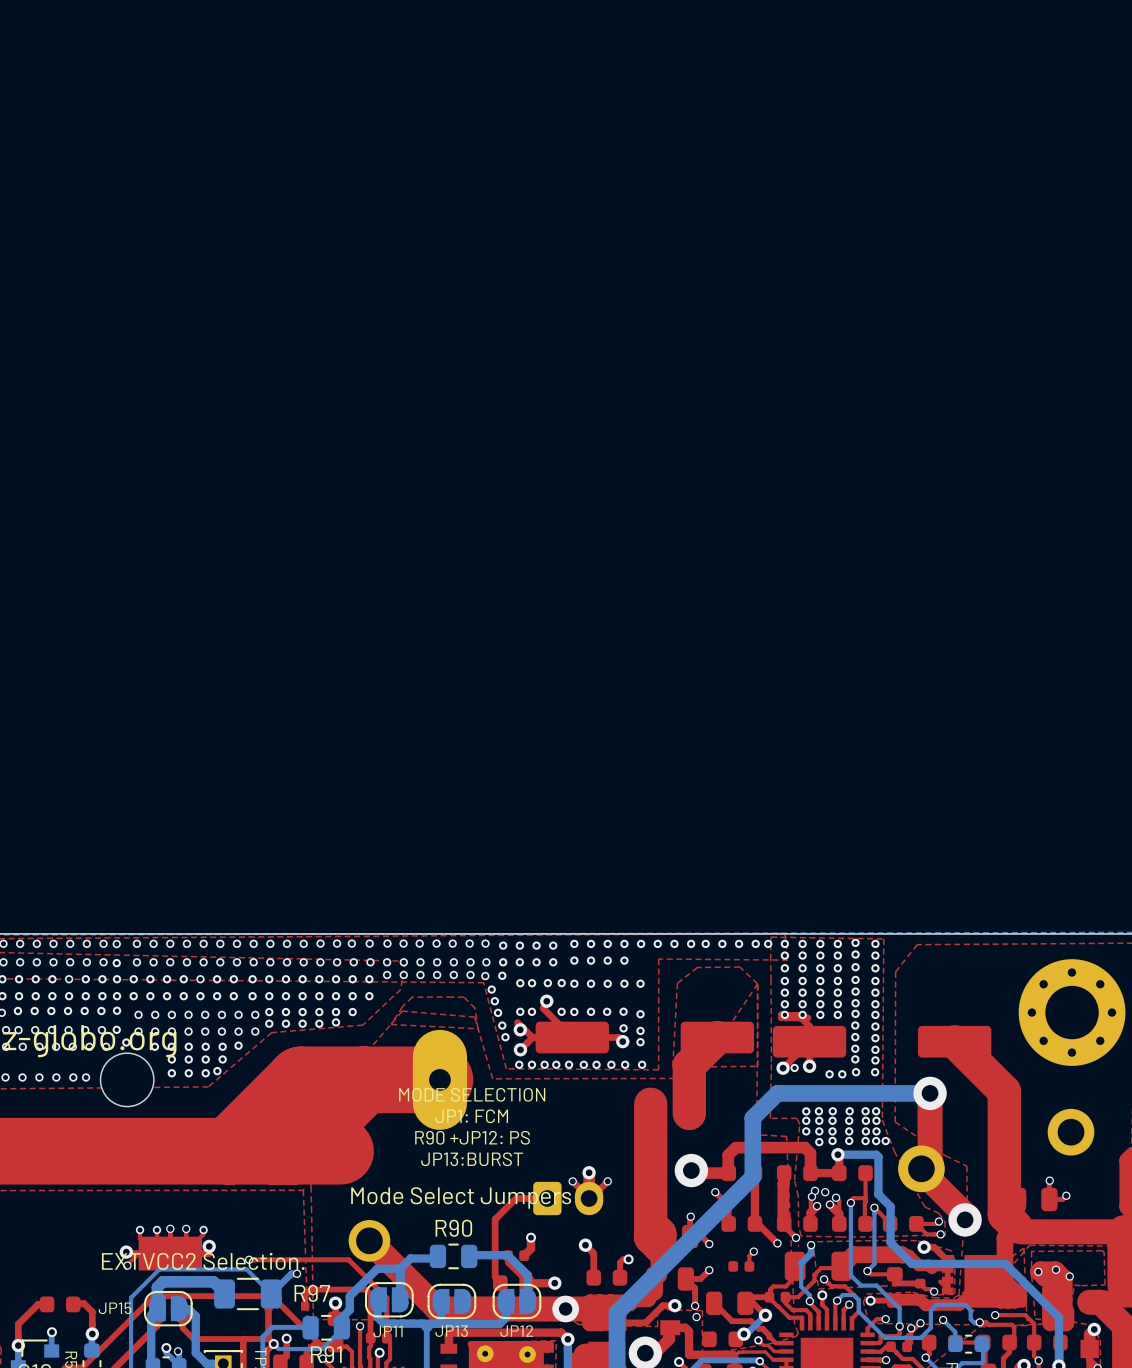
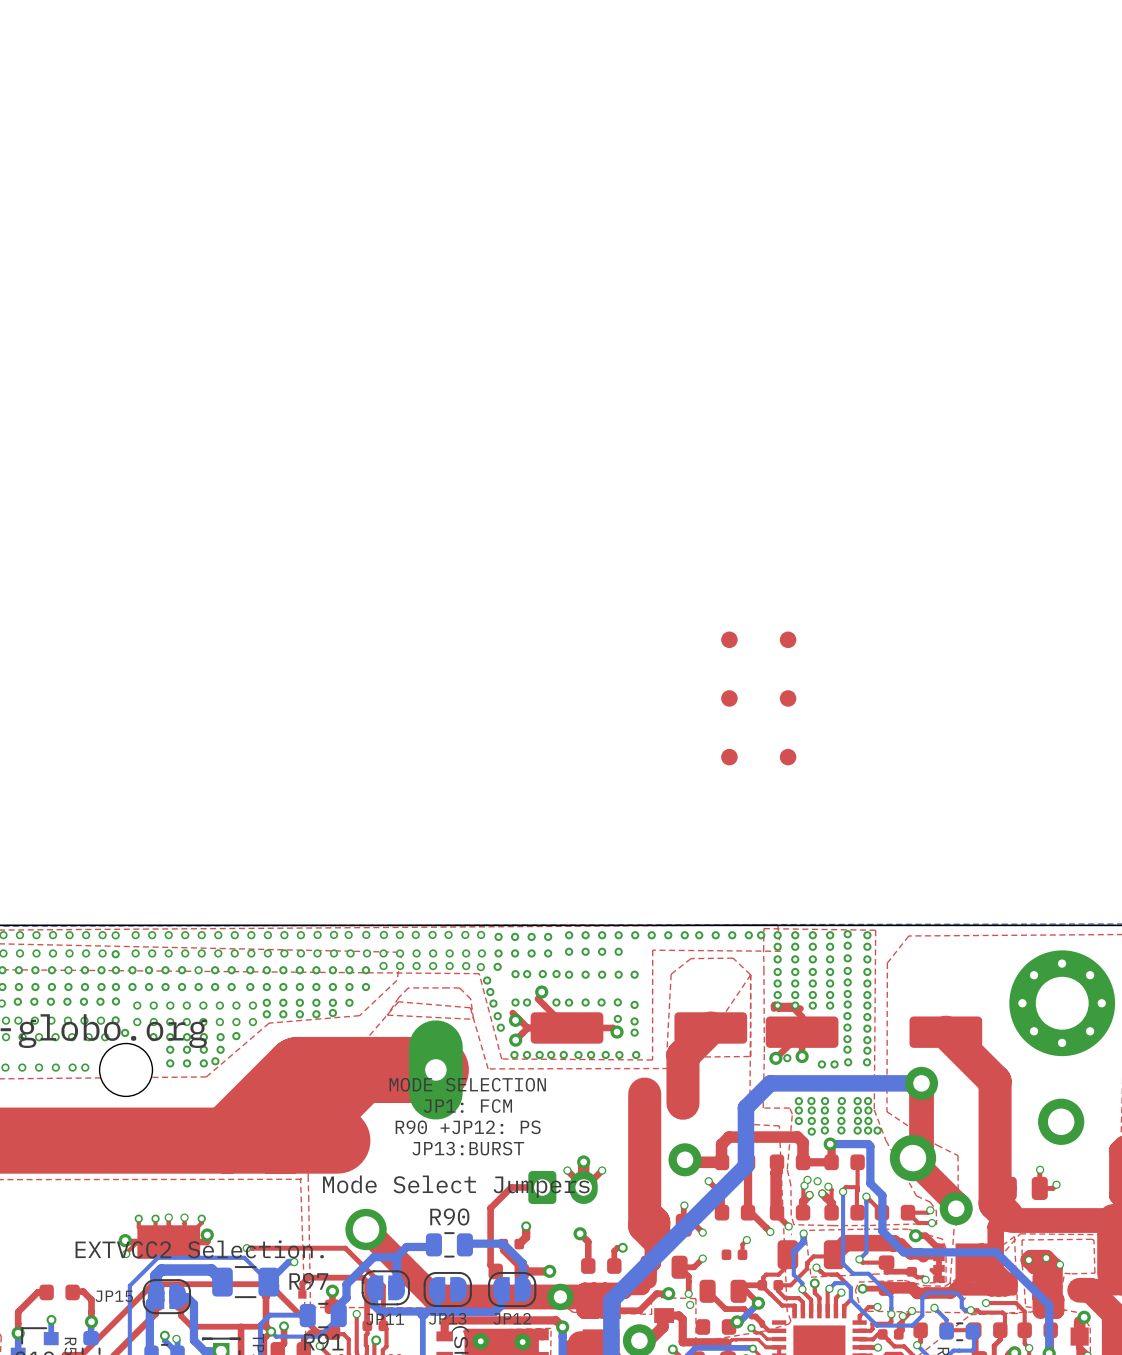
part: none -> (729, 639)
part: none -> (788, 639)
part: none -> (729, 698)
part: none -> (788, 698)
part: none -> (729, 757)
part: none -> (788, 757)

